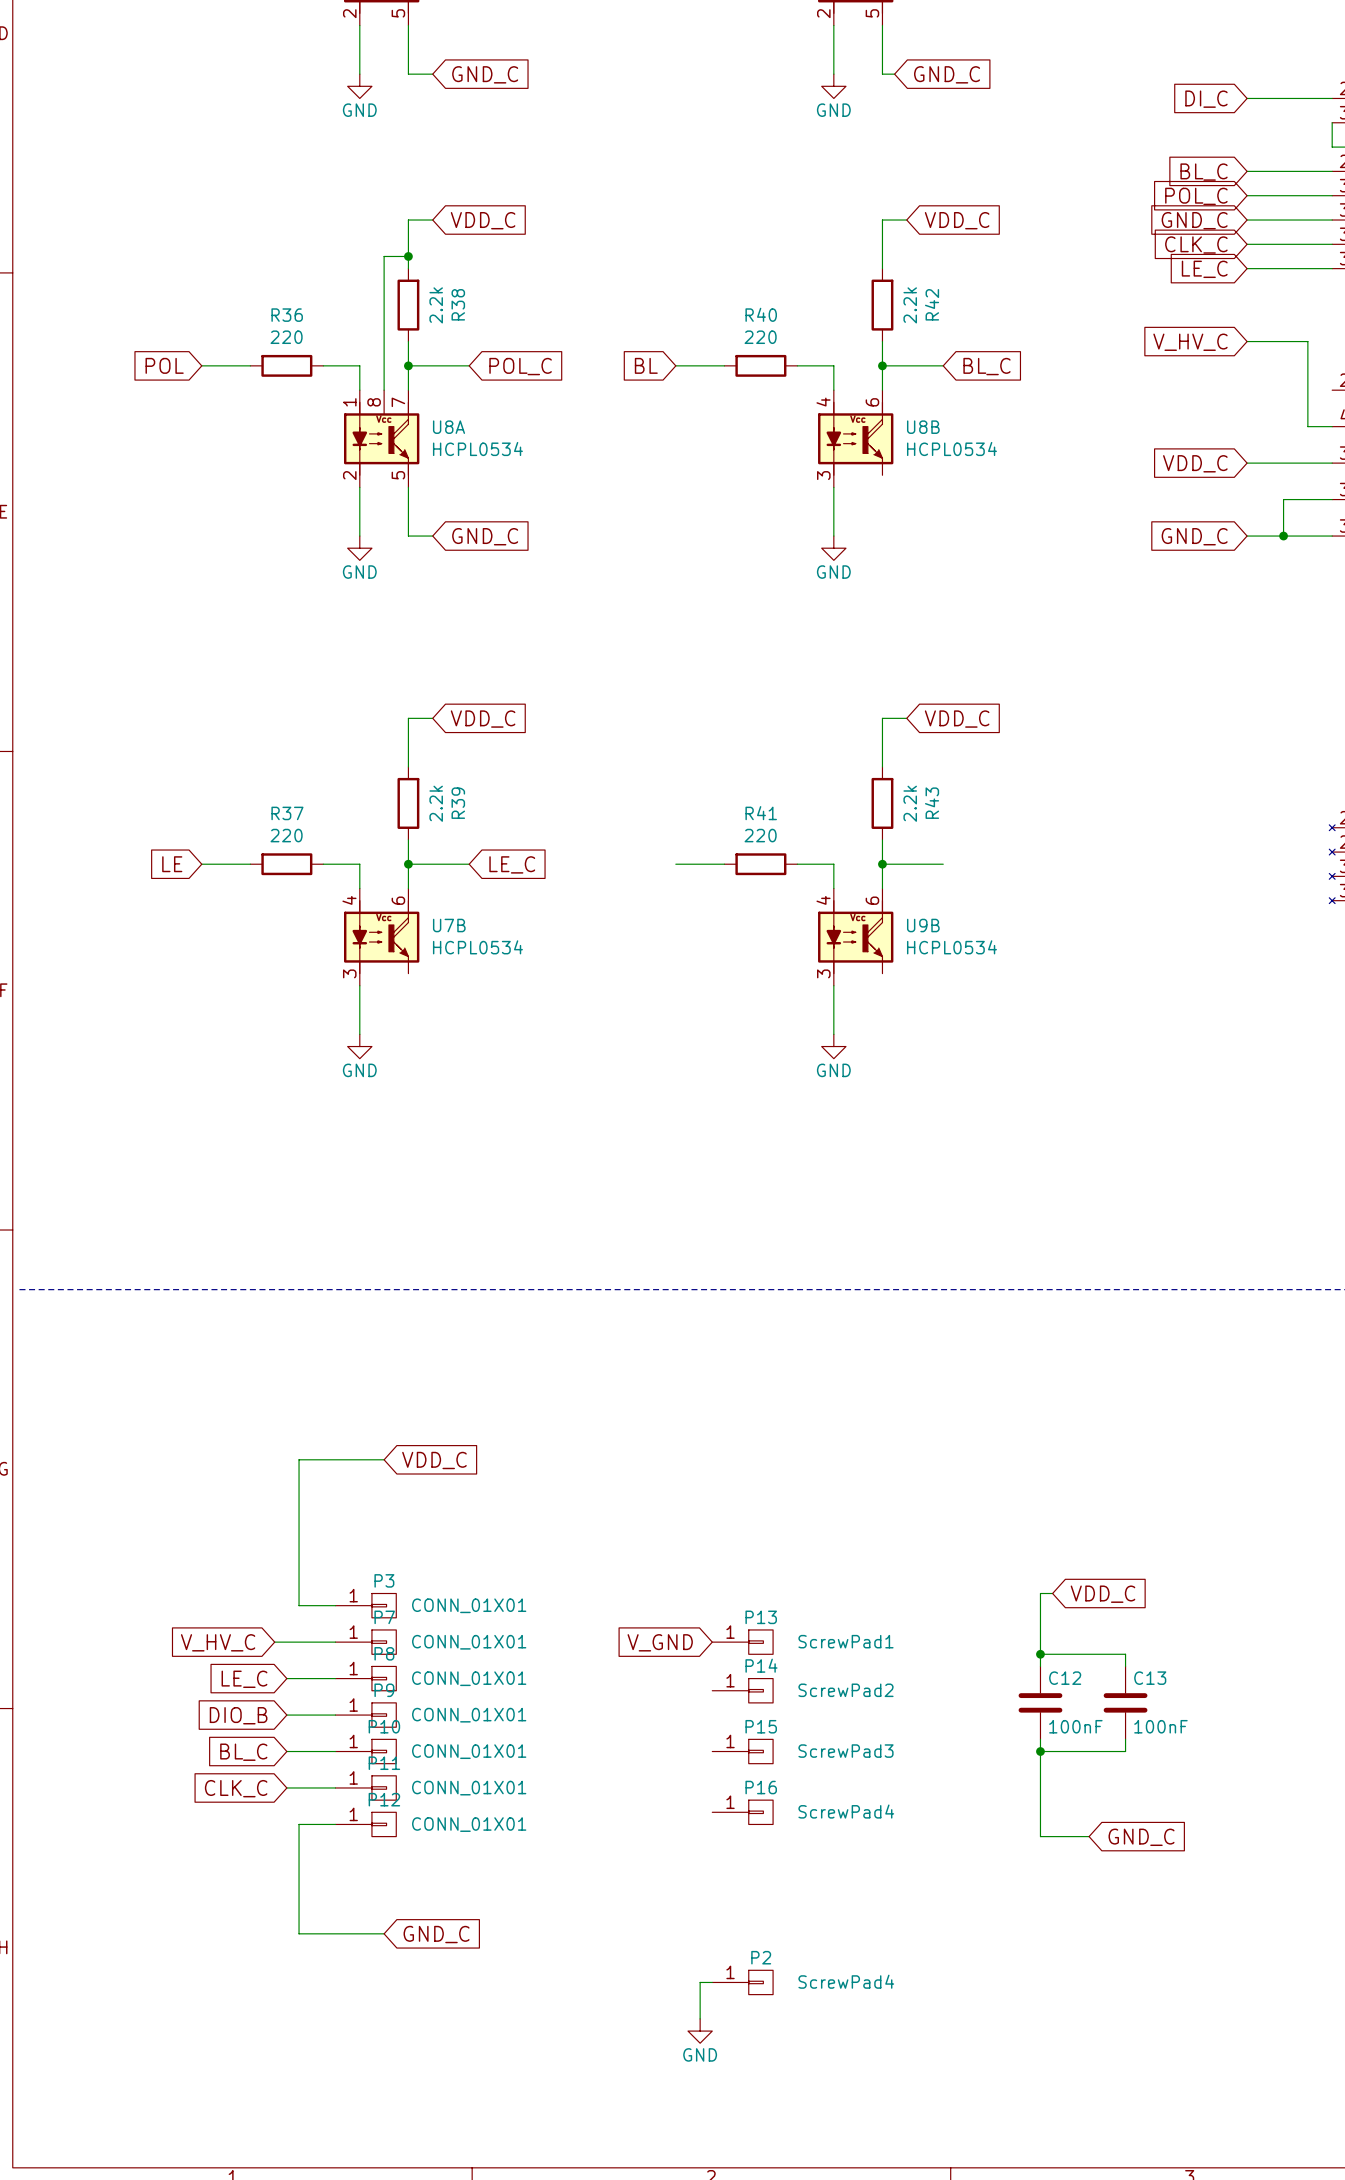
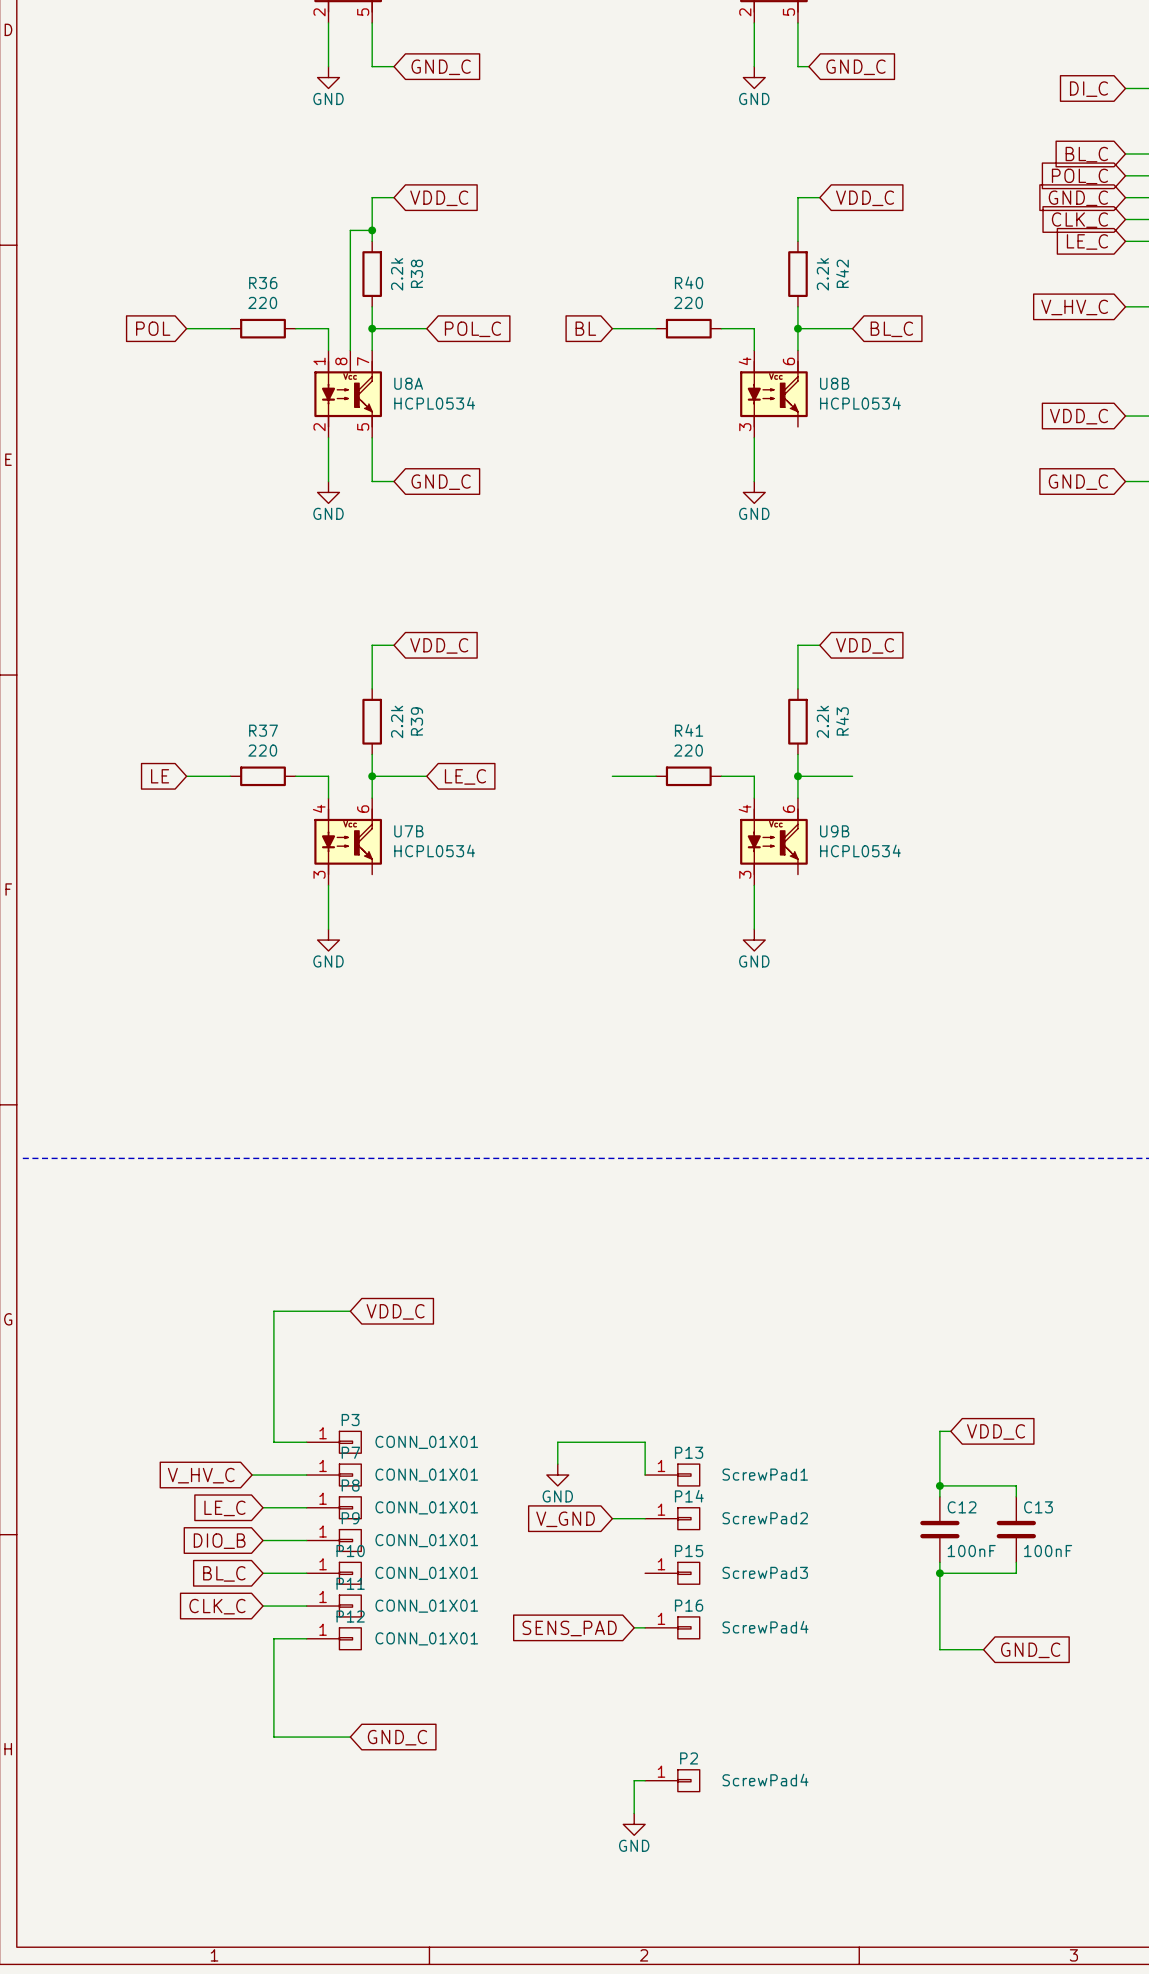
wire: none -> (557, 1464) (557, 1442) (645, 1442) (645, 1475)
power symbol: none -> GND (557, 1475)
global label position: V_GND (660, 1642) -> V_GND (565, 1519)
wire: none -> (612, 1518) (645, 1518)
global label: none -> SENS_PAD (569, 1628)
wire: none -> (634, 1627) (645, 1627)

